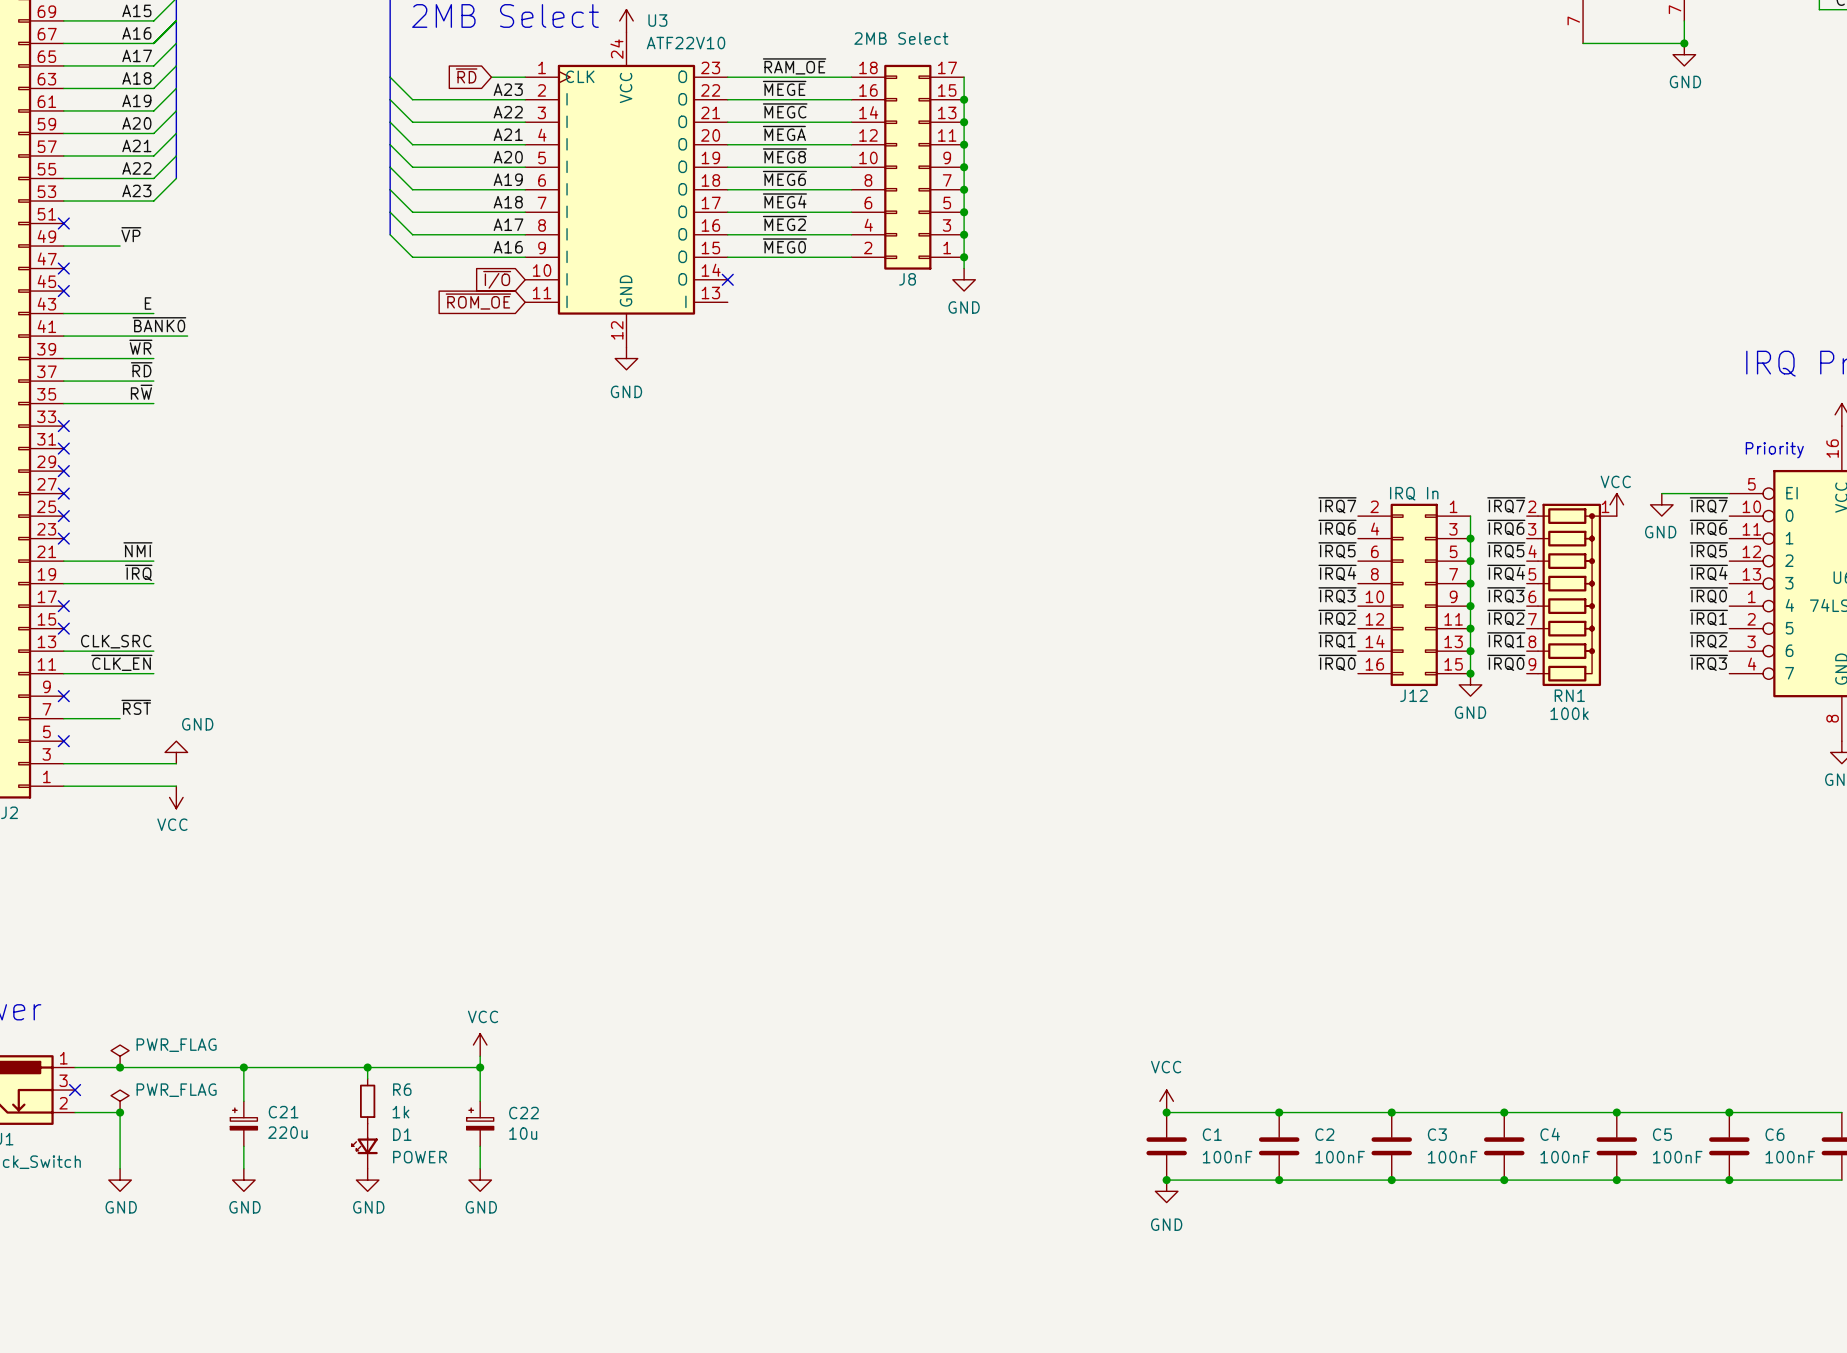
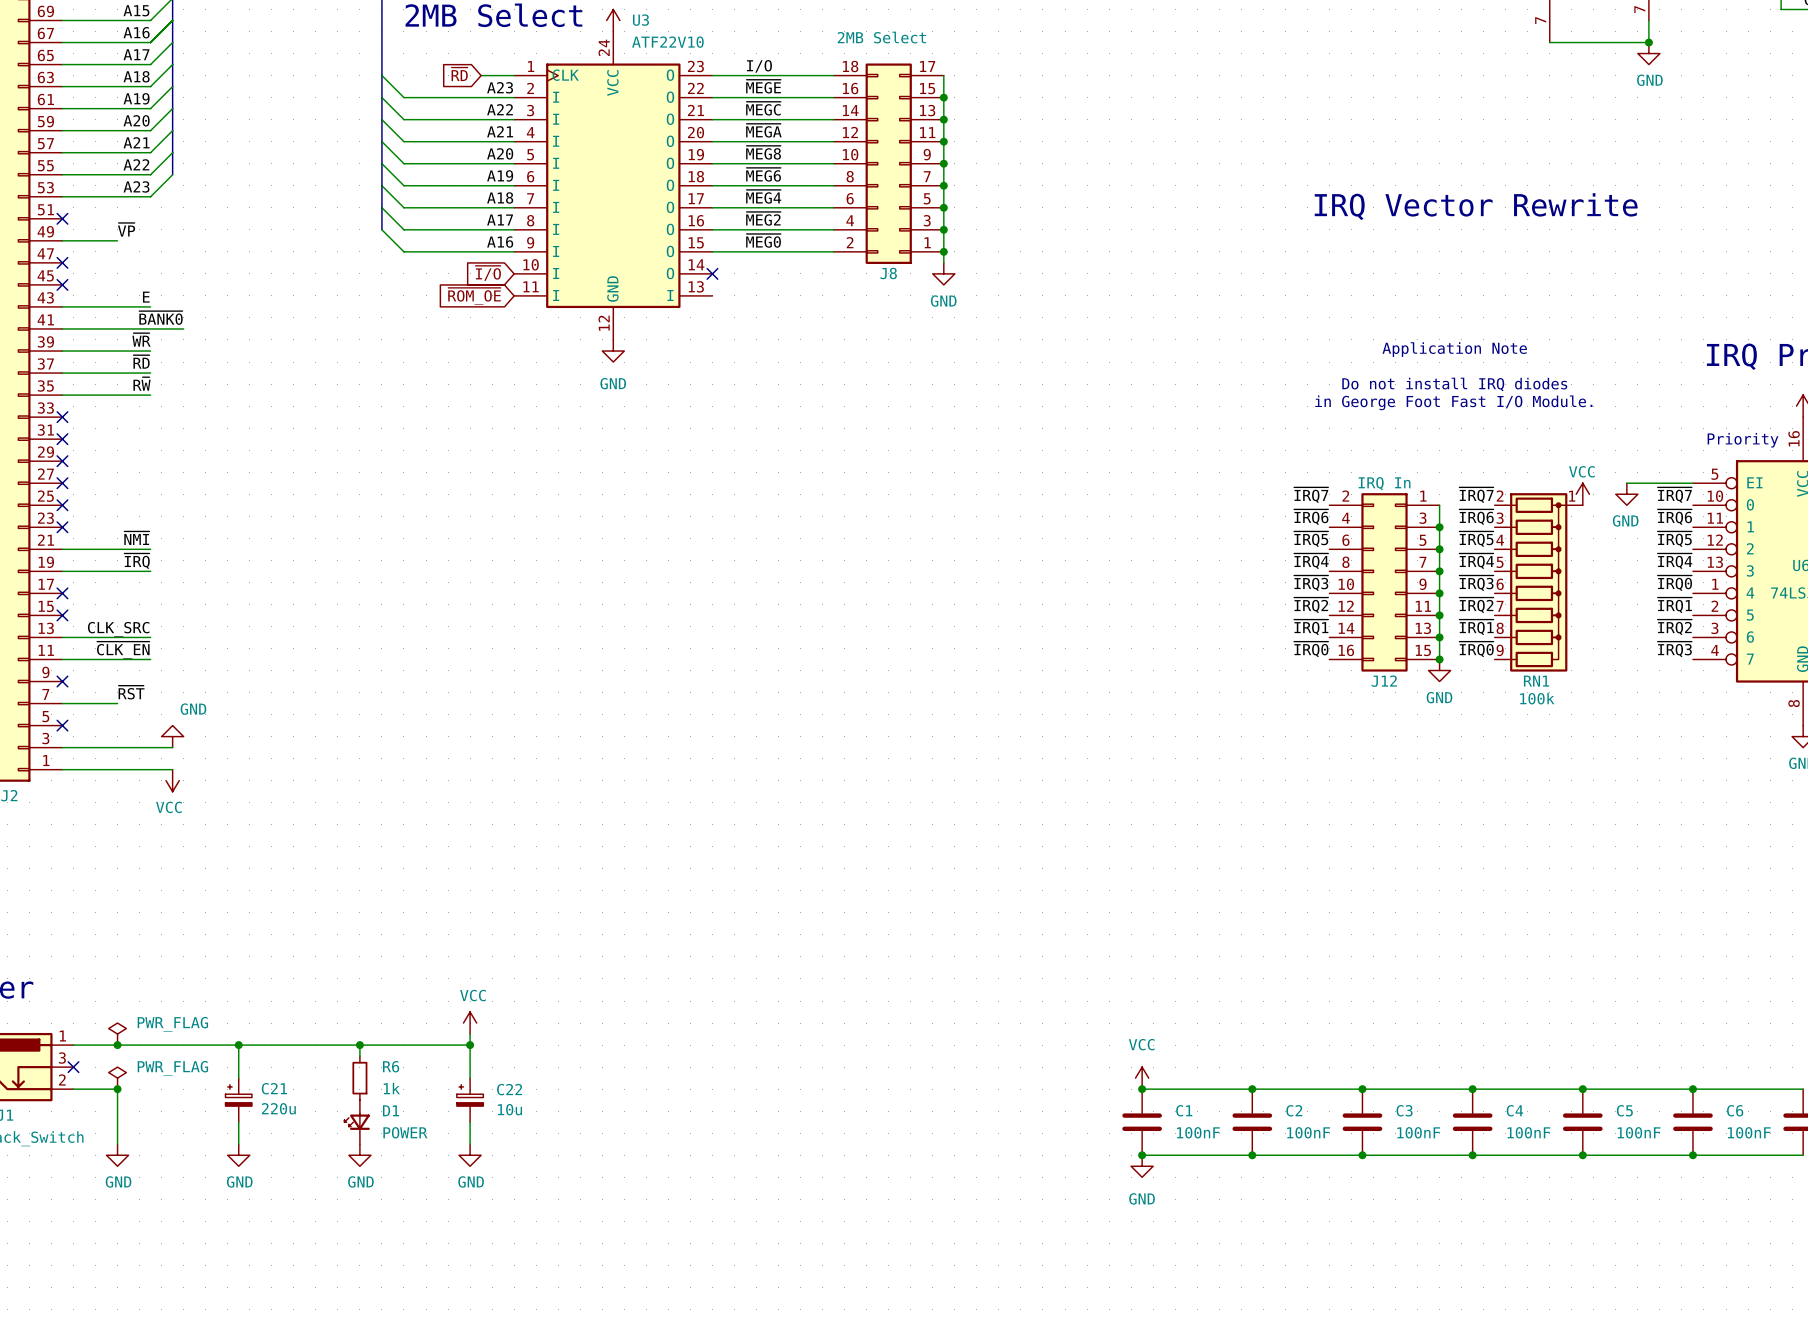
label: ~{RAM_OE} (794, 66) -> I/O (759, 66)
text: none -> IRQ Vector Rewrite (1476, 206)
text: none -> Application Note (1454, 349)
text: none -> Do not install IRQ diodes (1454, 384)
text: none -> in George Foot Fast I/O Module. (1453, 402)

